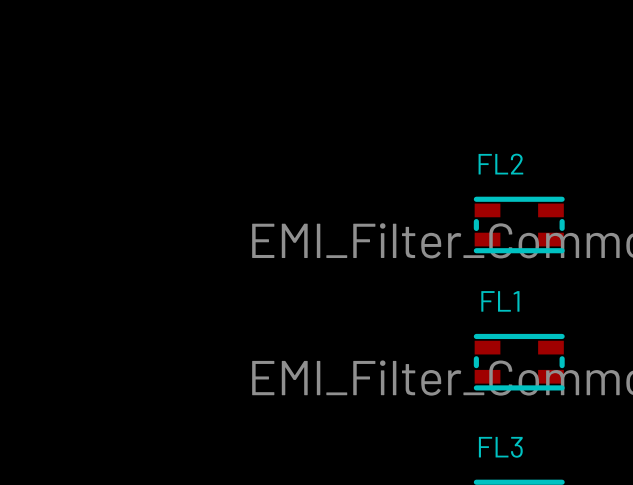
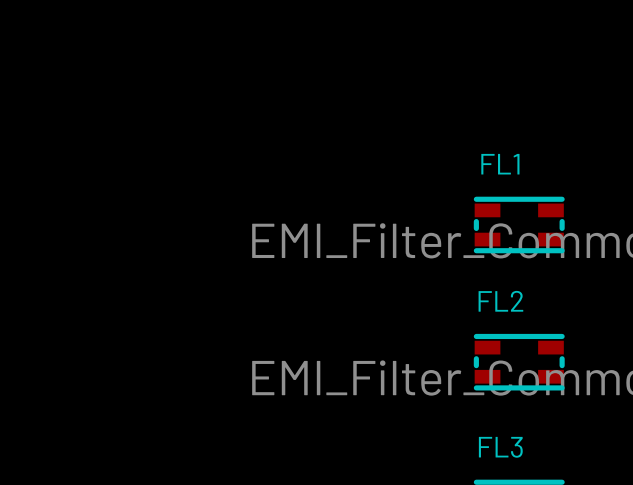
FL2 name: FL2 (500, 164) -> FL1 (500, 164)
FL1 name: FL1 (500, 301) -> FL2 (500, 301)

